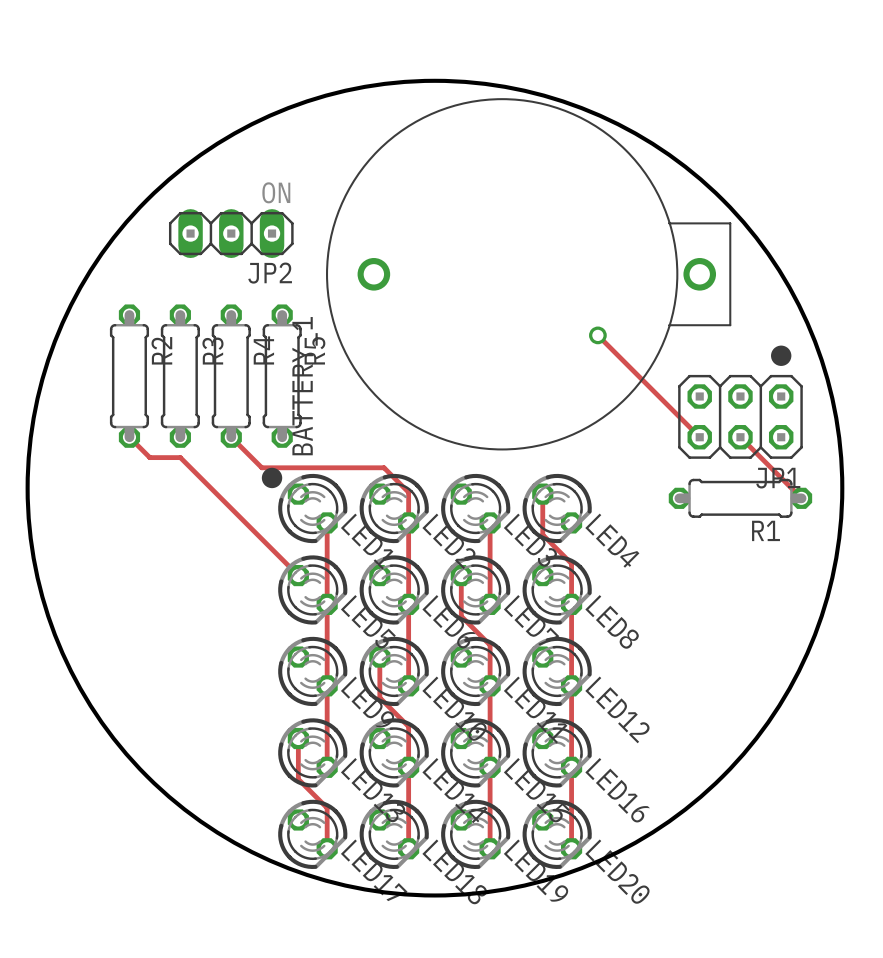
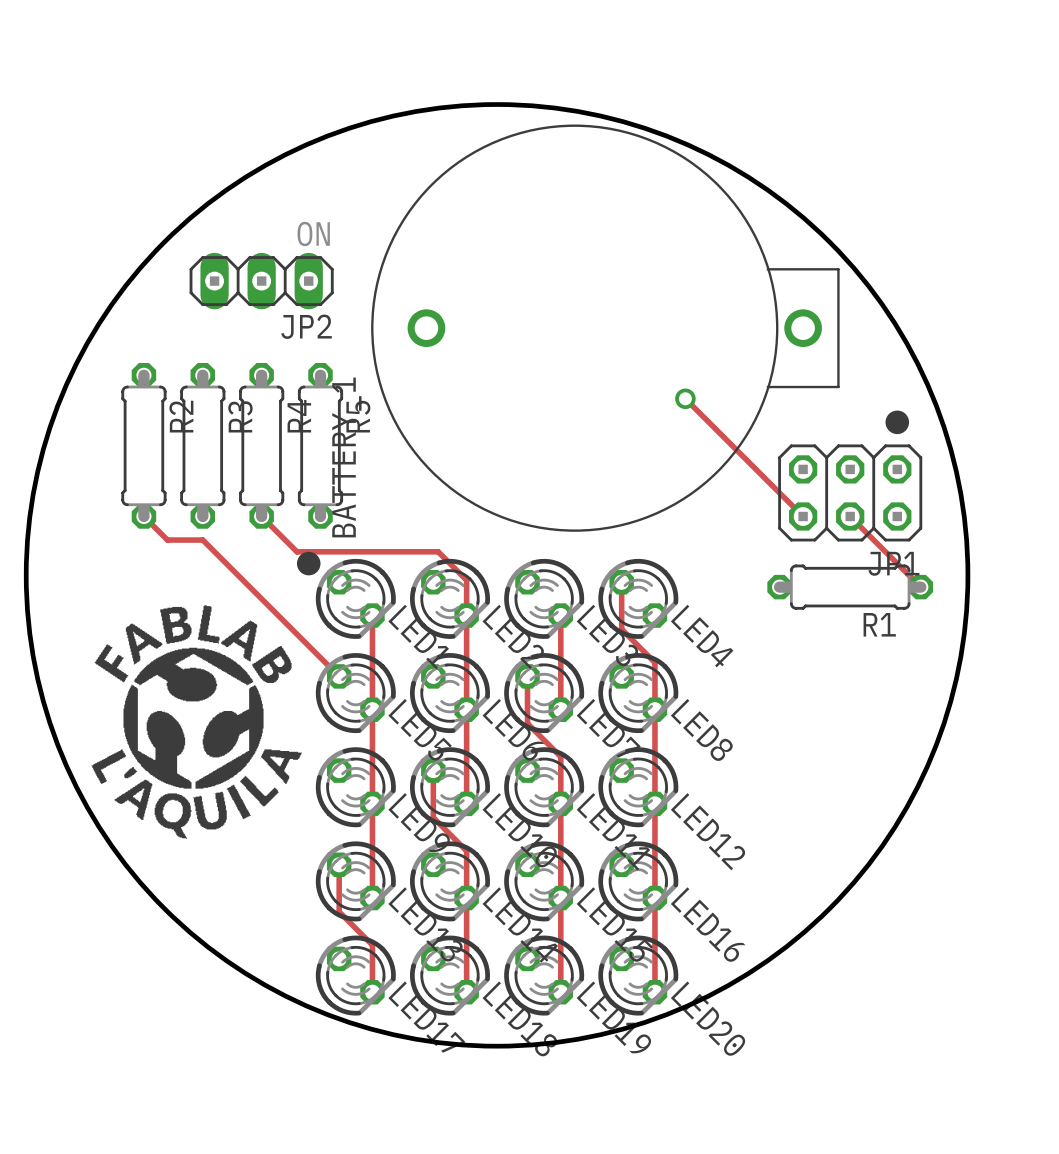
drawing: none -> [91, 605, 302, 840]

